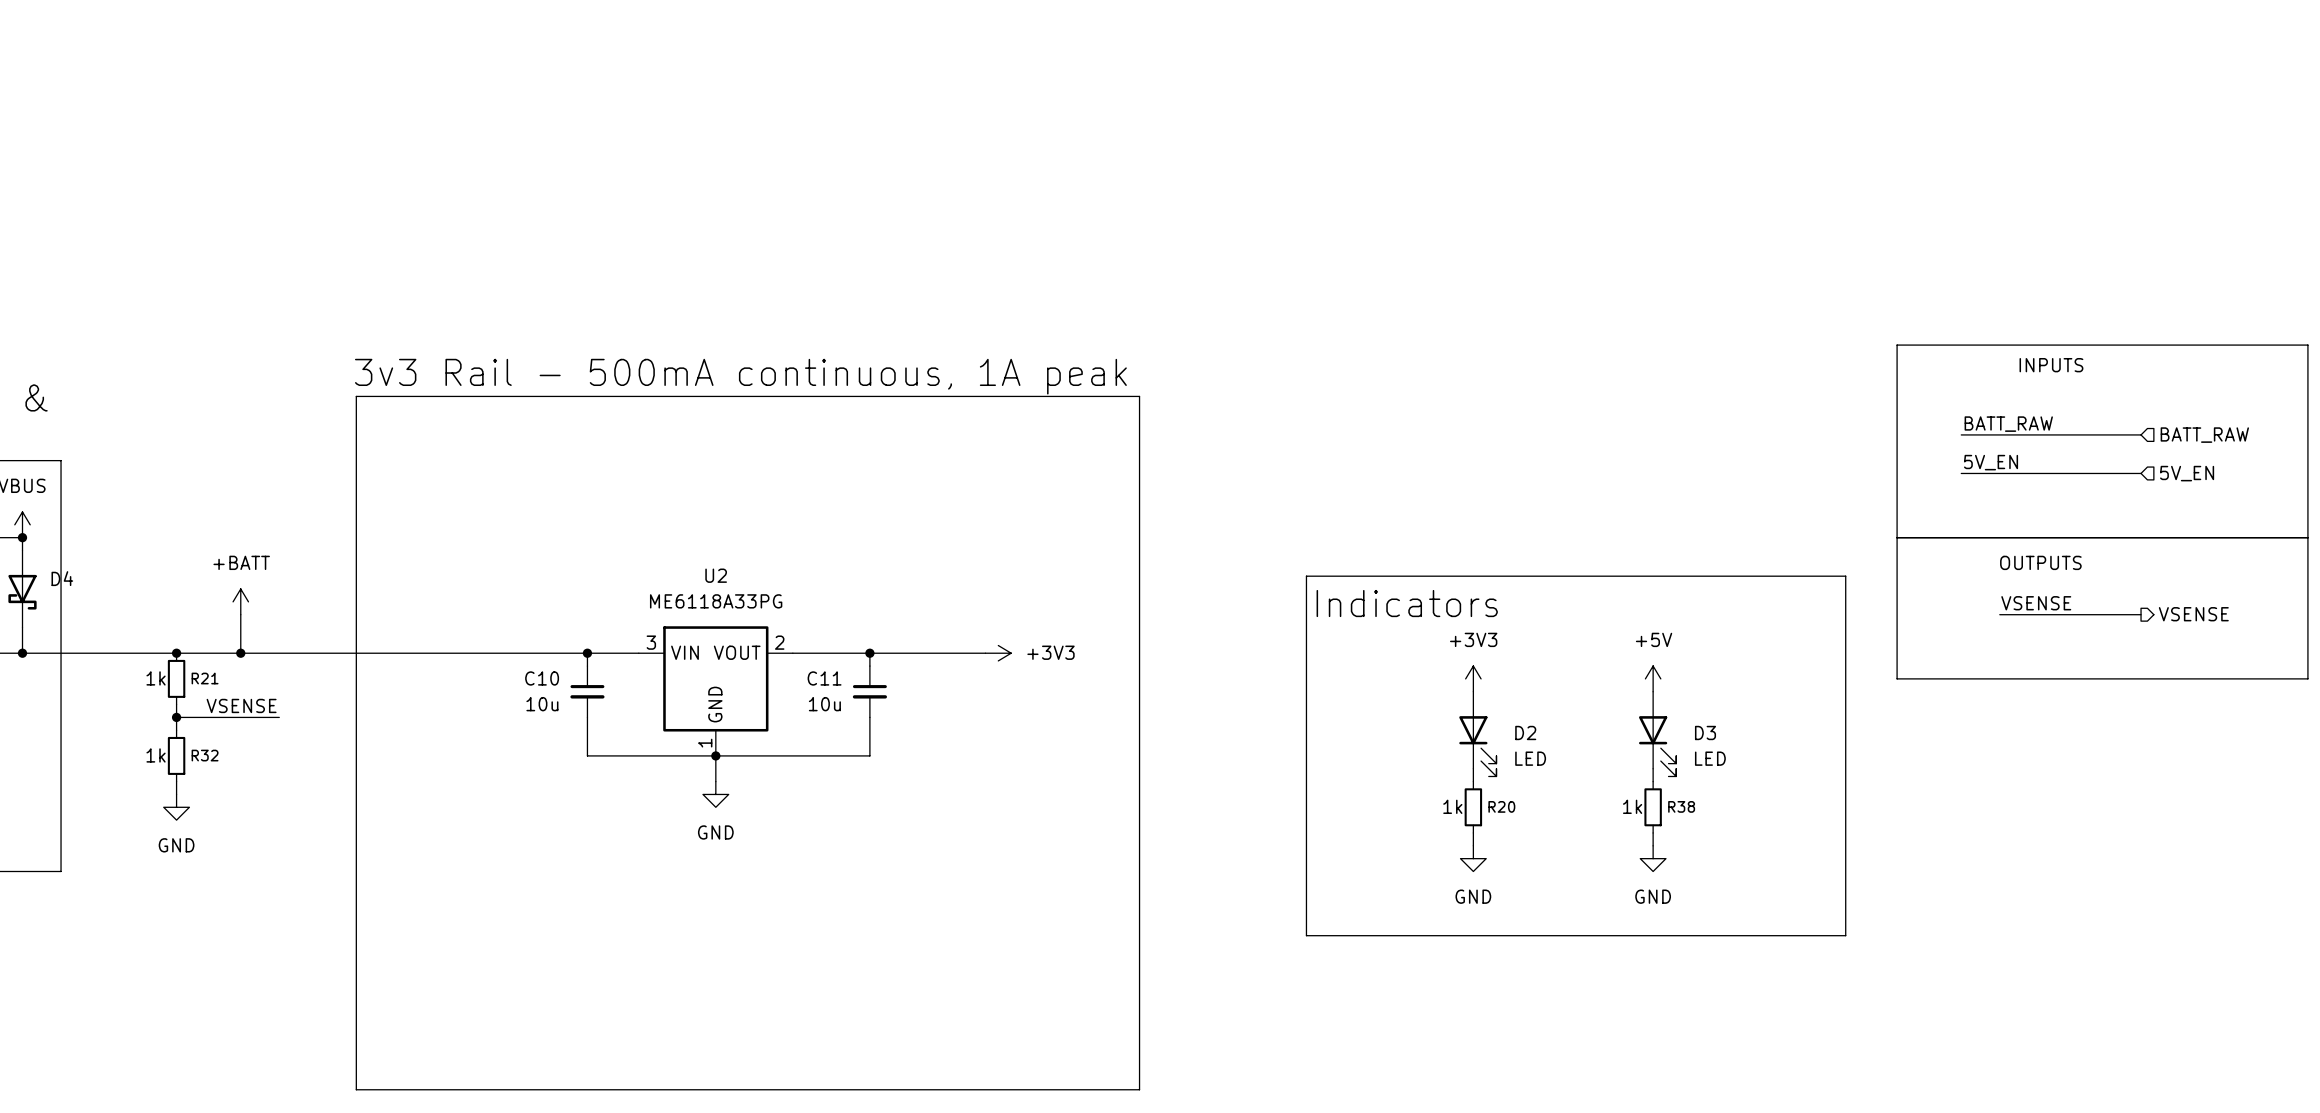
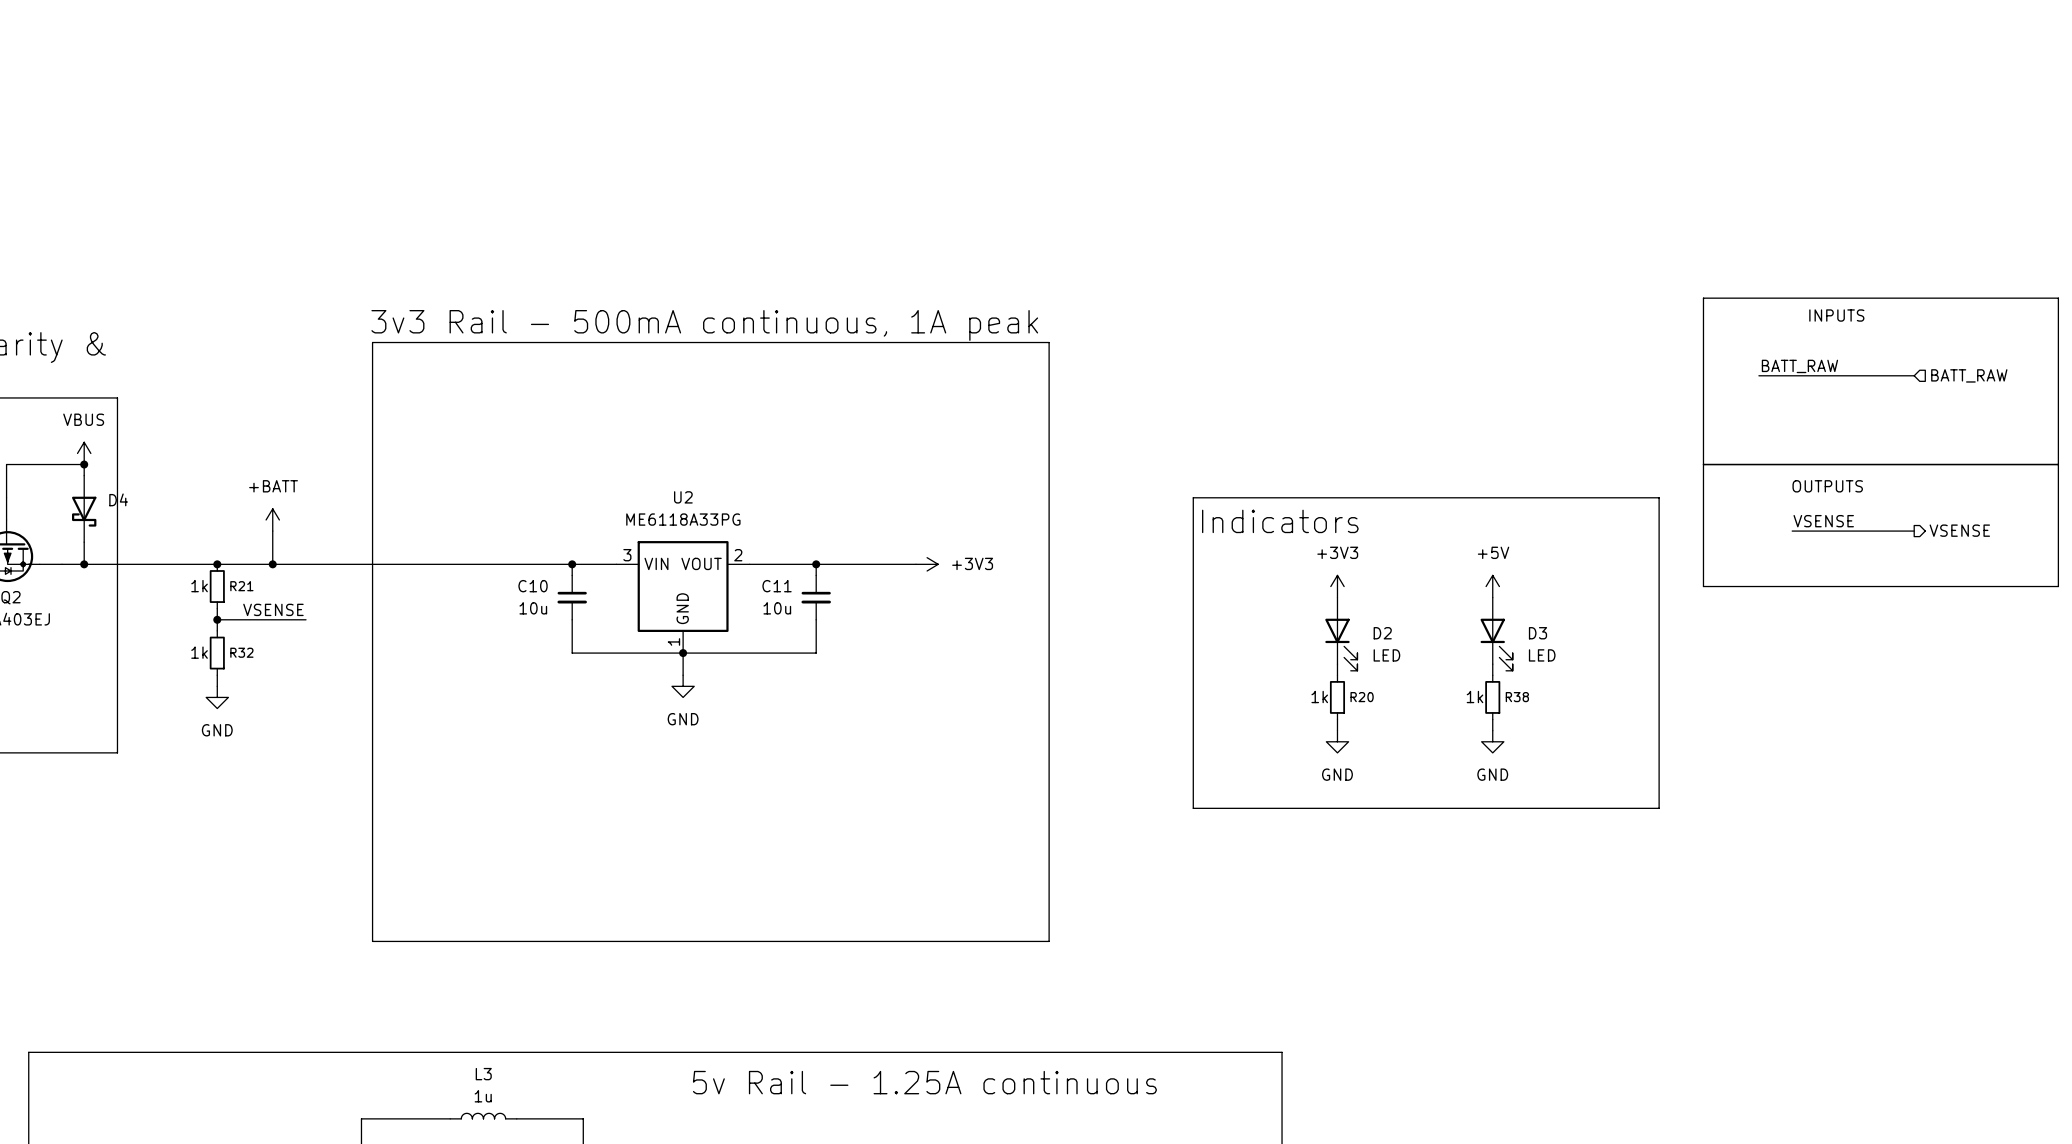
label: 5V_EN (1991, 462) -> none
wire: (1961, 473) (2141, 473) -> none
hierarchical label: 5V_EN (2187, 473) -> none

